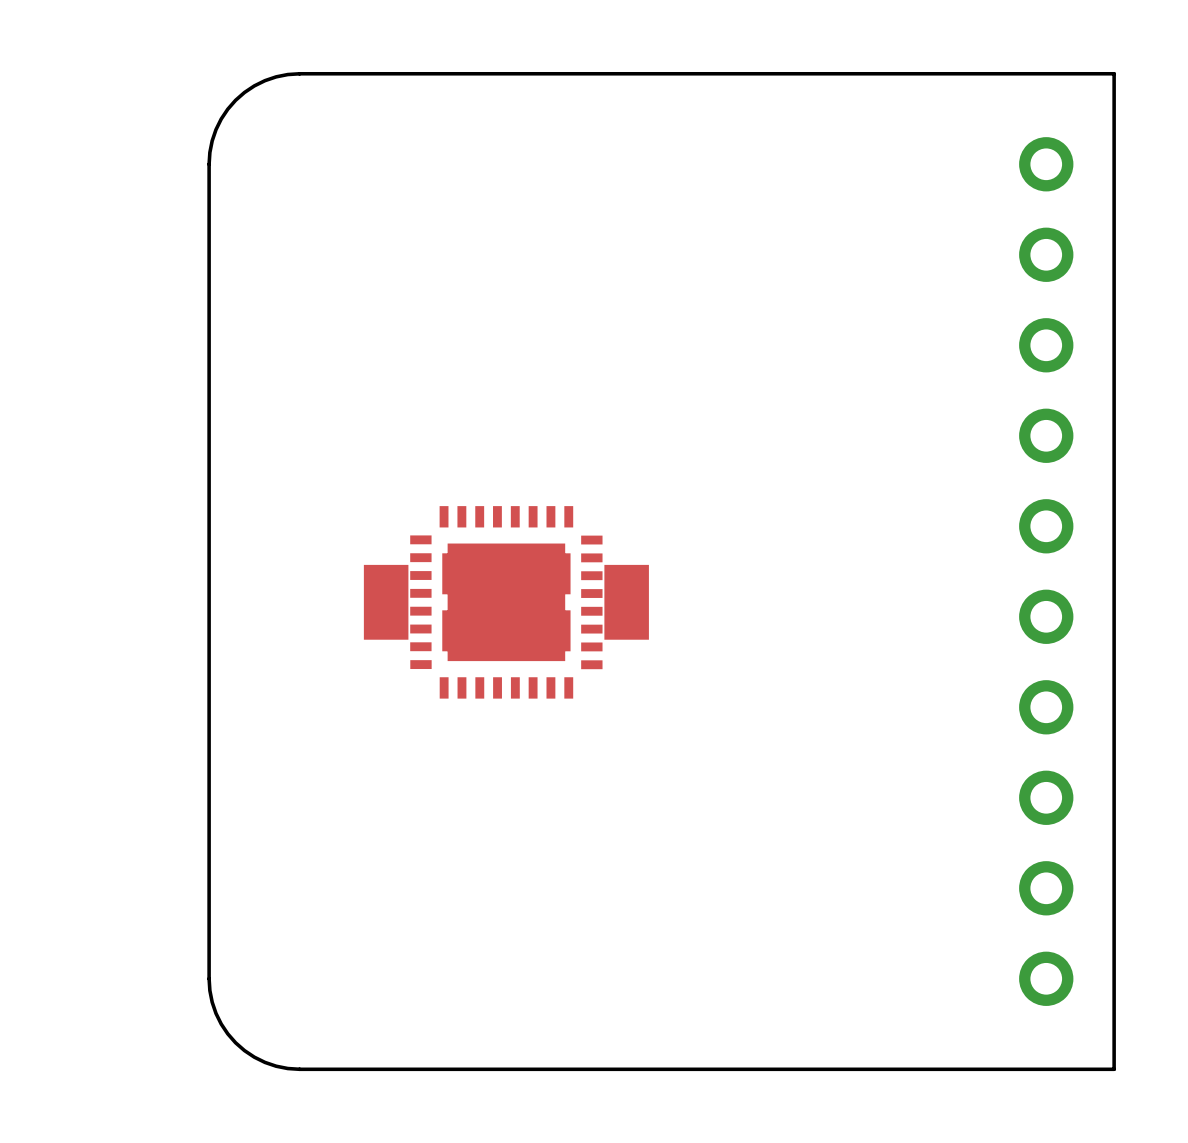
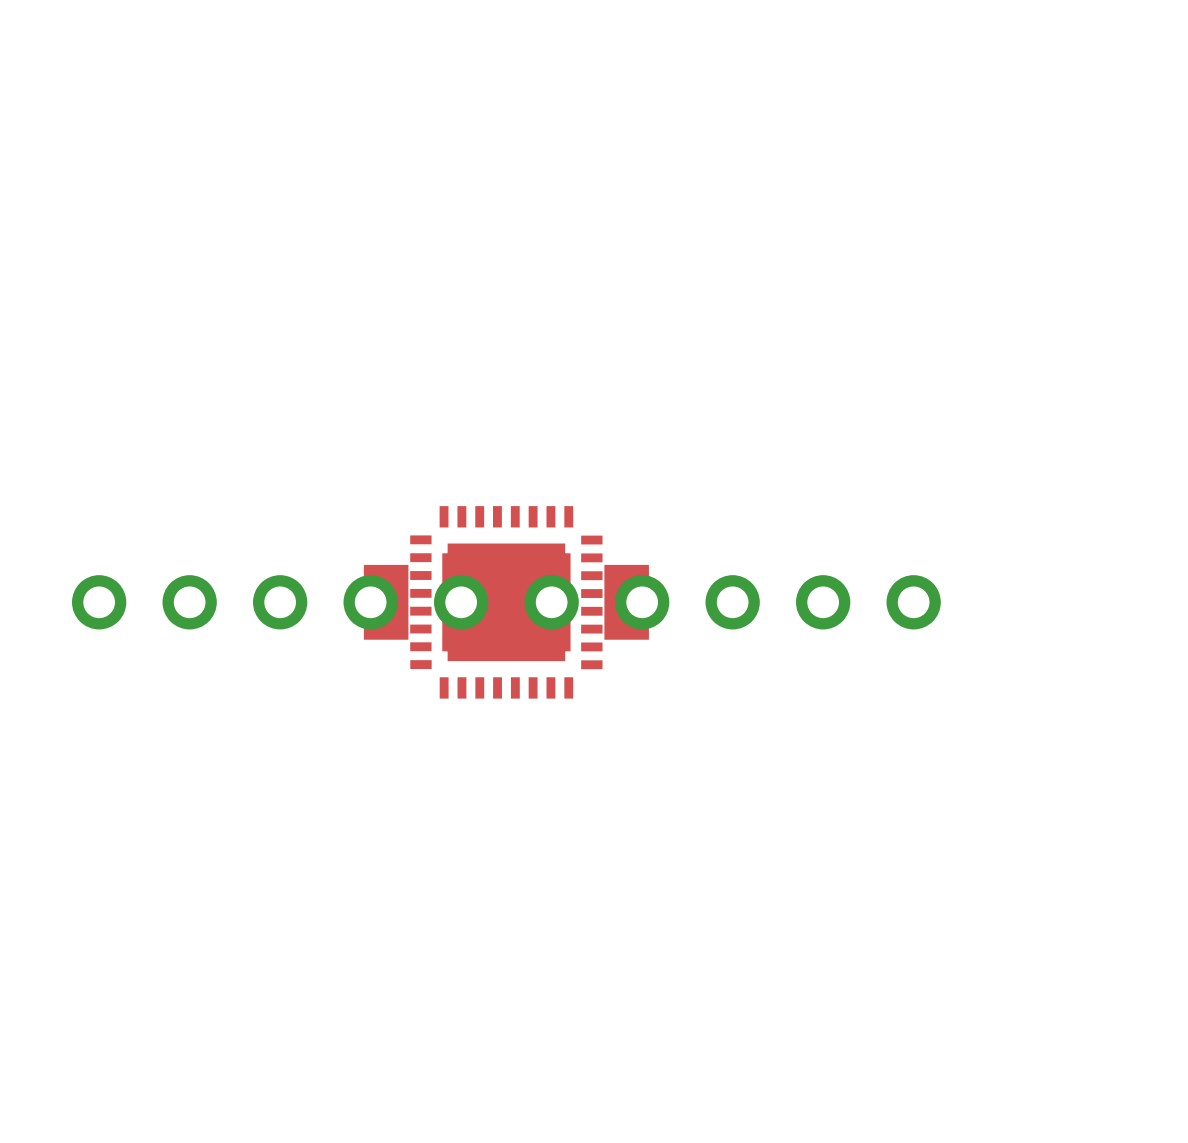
board edge: (1114, 73) (299, 73) (276, 76) (264, 80) (244, 92) (235, 100) (227, 109) (215, 129) (212, 140) (209, 164) (209, 978) (212, 1002) (215, 1013) (227, 1033) (235, 1042) (244, 1050) (264, 1062) (276, 1066) (299, 1069) (1114, 1069) (1114, 73) -> none
part rotation: 0° (1046, 571) -> 90° clockwise (506, 602)
part position: (1046, 571) -> (506, 602)

